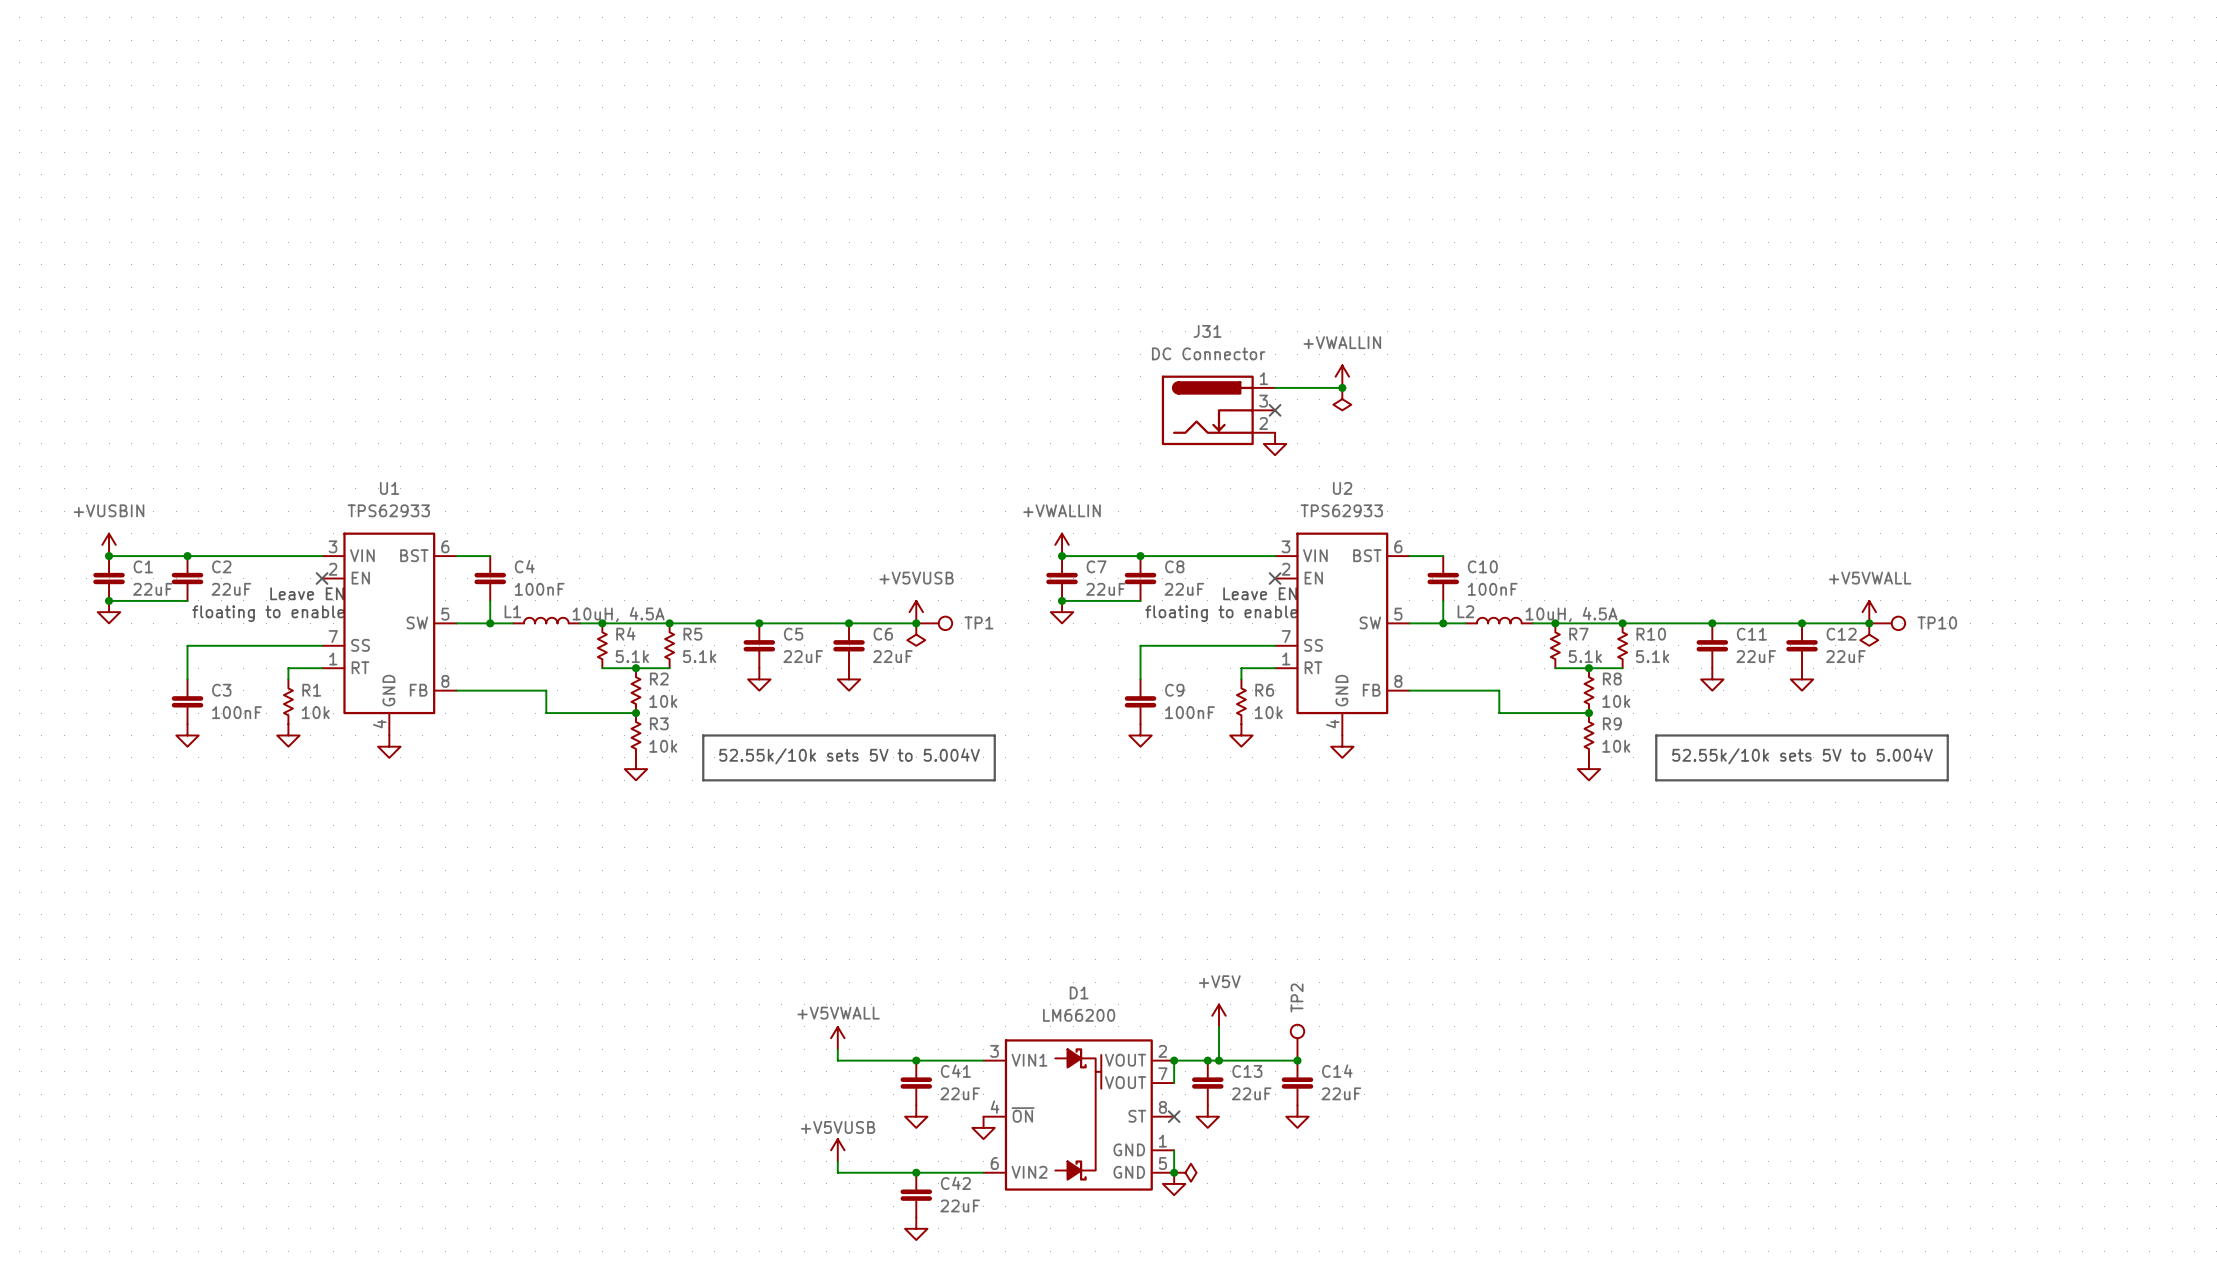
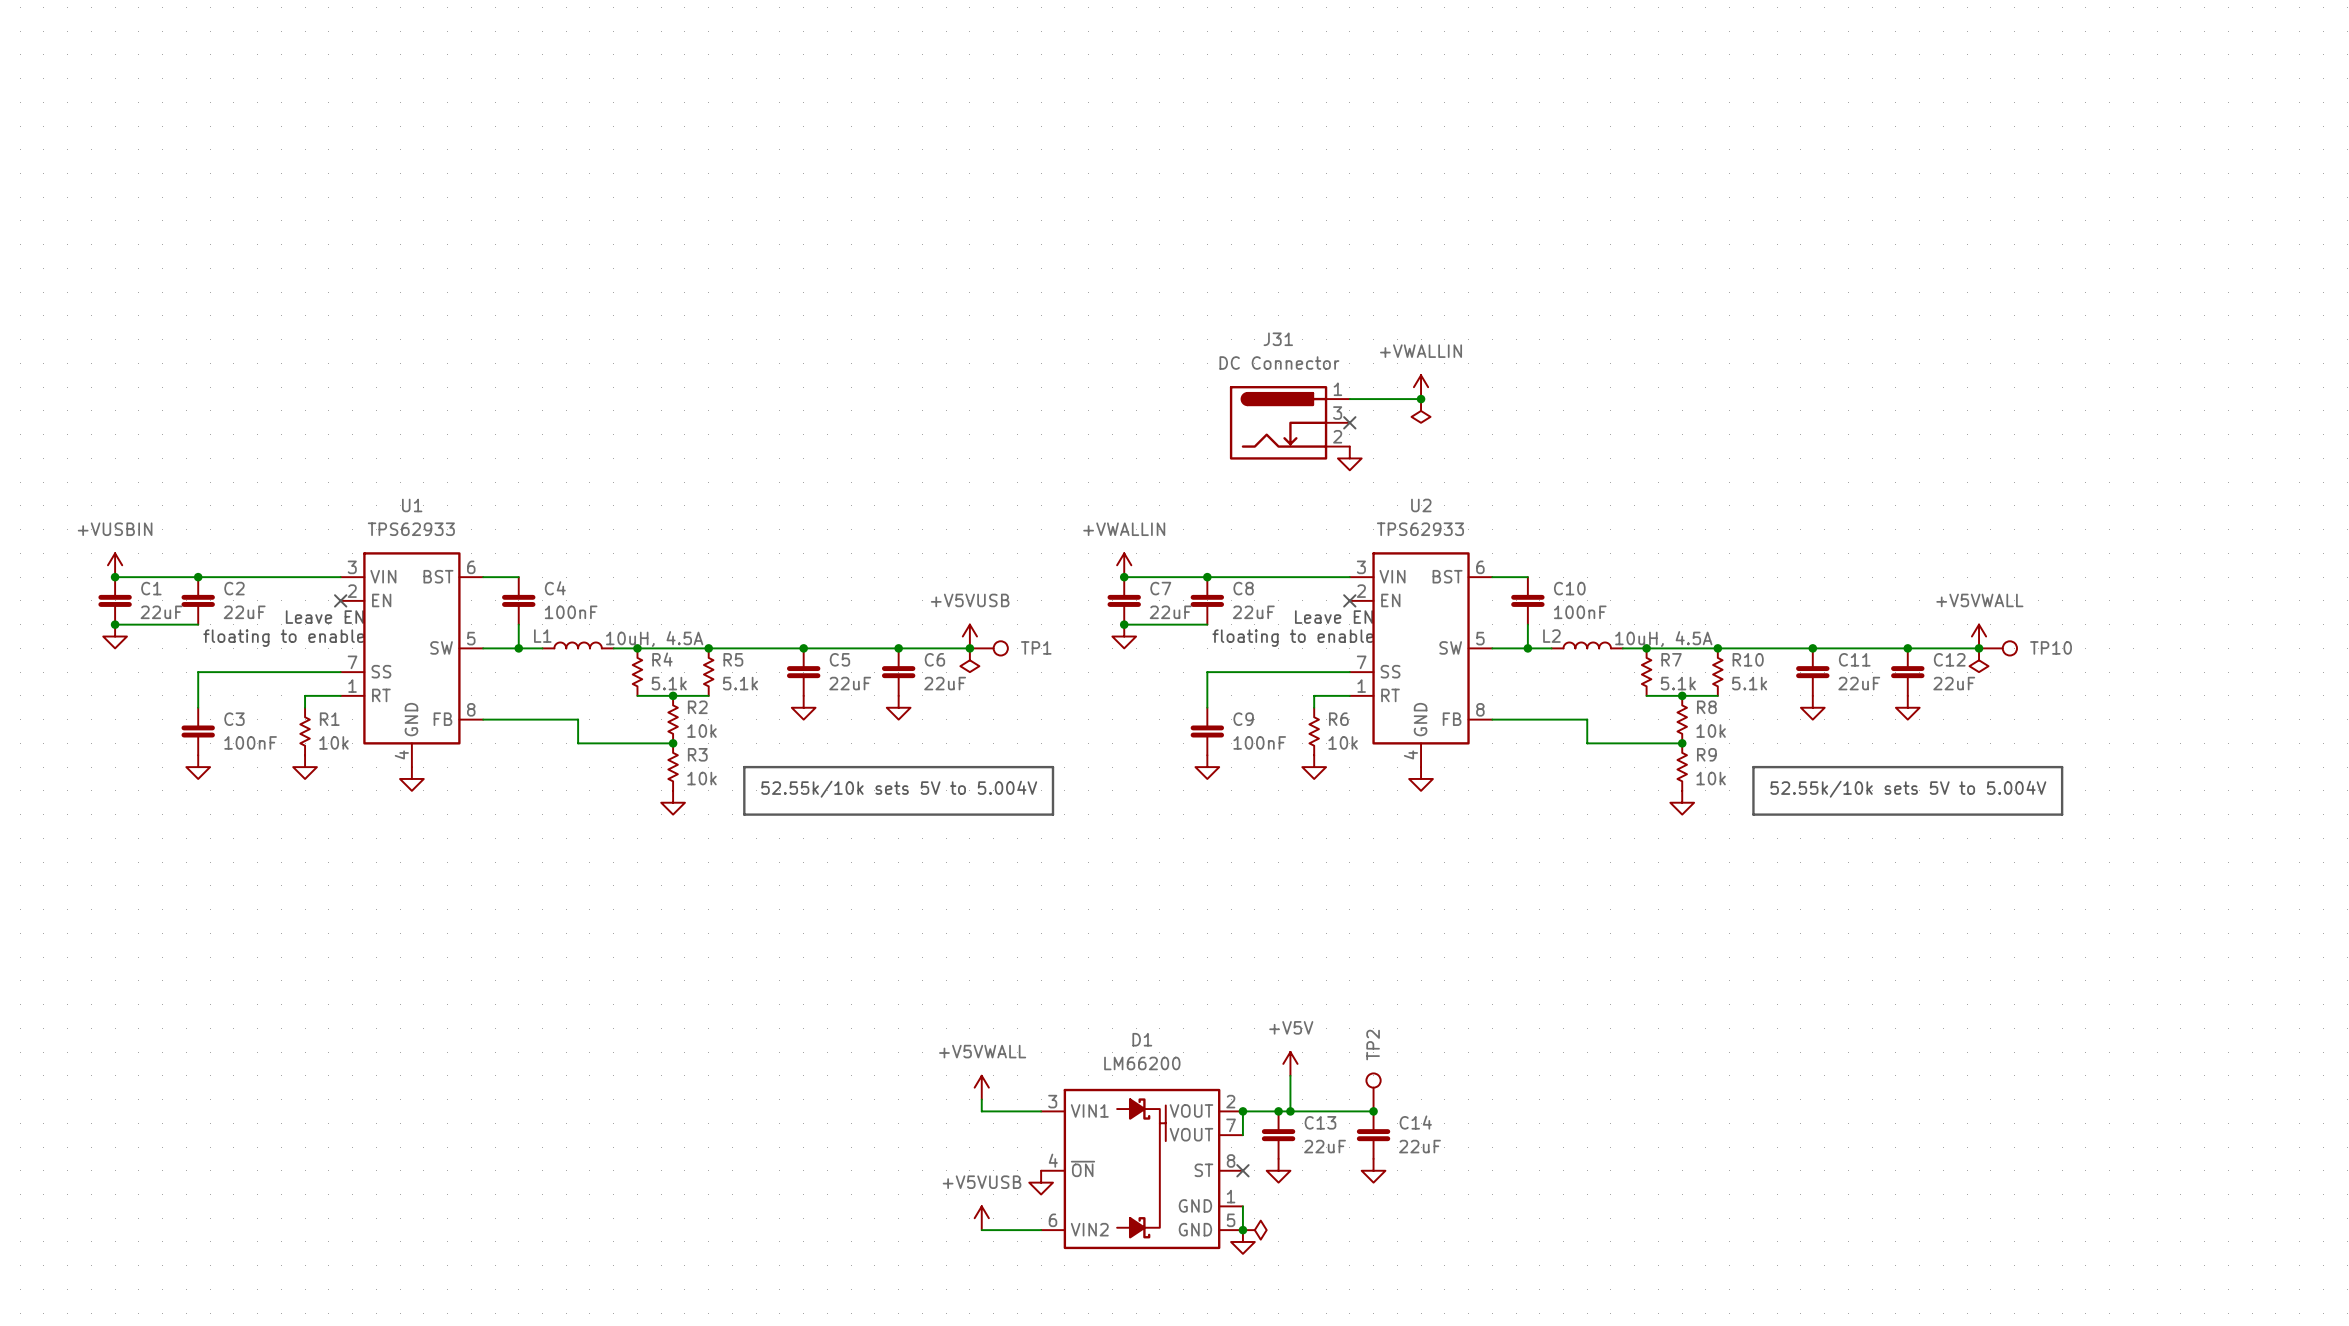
power symbol text position: +V5VWALL (838, 1013) -> +V5VWALL (982, 1051)
power symbol position: +V5VWALL (837, 1038) -> +V5VWALL (981, 1087)
wire: (837, 1049) (837, 1060) (927, 1060) -> (981, 1099) (981, 1111)
junction: (916, 1060) -> none
C41: (916, 1083) -> none
power symbol: (916, 1116) -> none
power symbol text position: +V5VUSB (838, 1127) -> +V5VUSB (982, 1182)
power symbol position: +V5VUSB (837, 1150) -> +V5VUSB (981, 1218)
wire: (837, 1161) (837, 1172) (927, 1172) -> none
junction: (916, 1172) -> none
C42: (916, 1195) -> none
power symbol: (916, 1228) -> none

